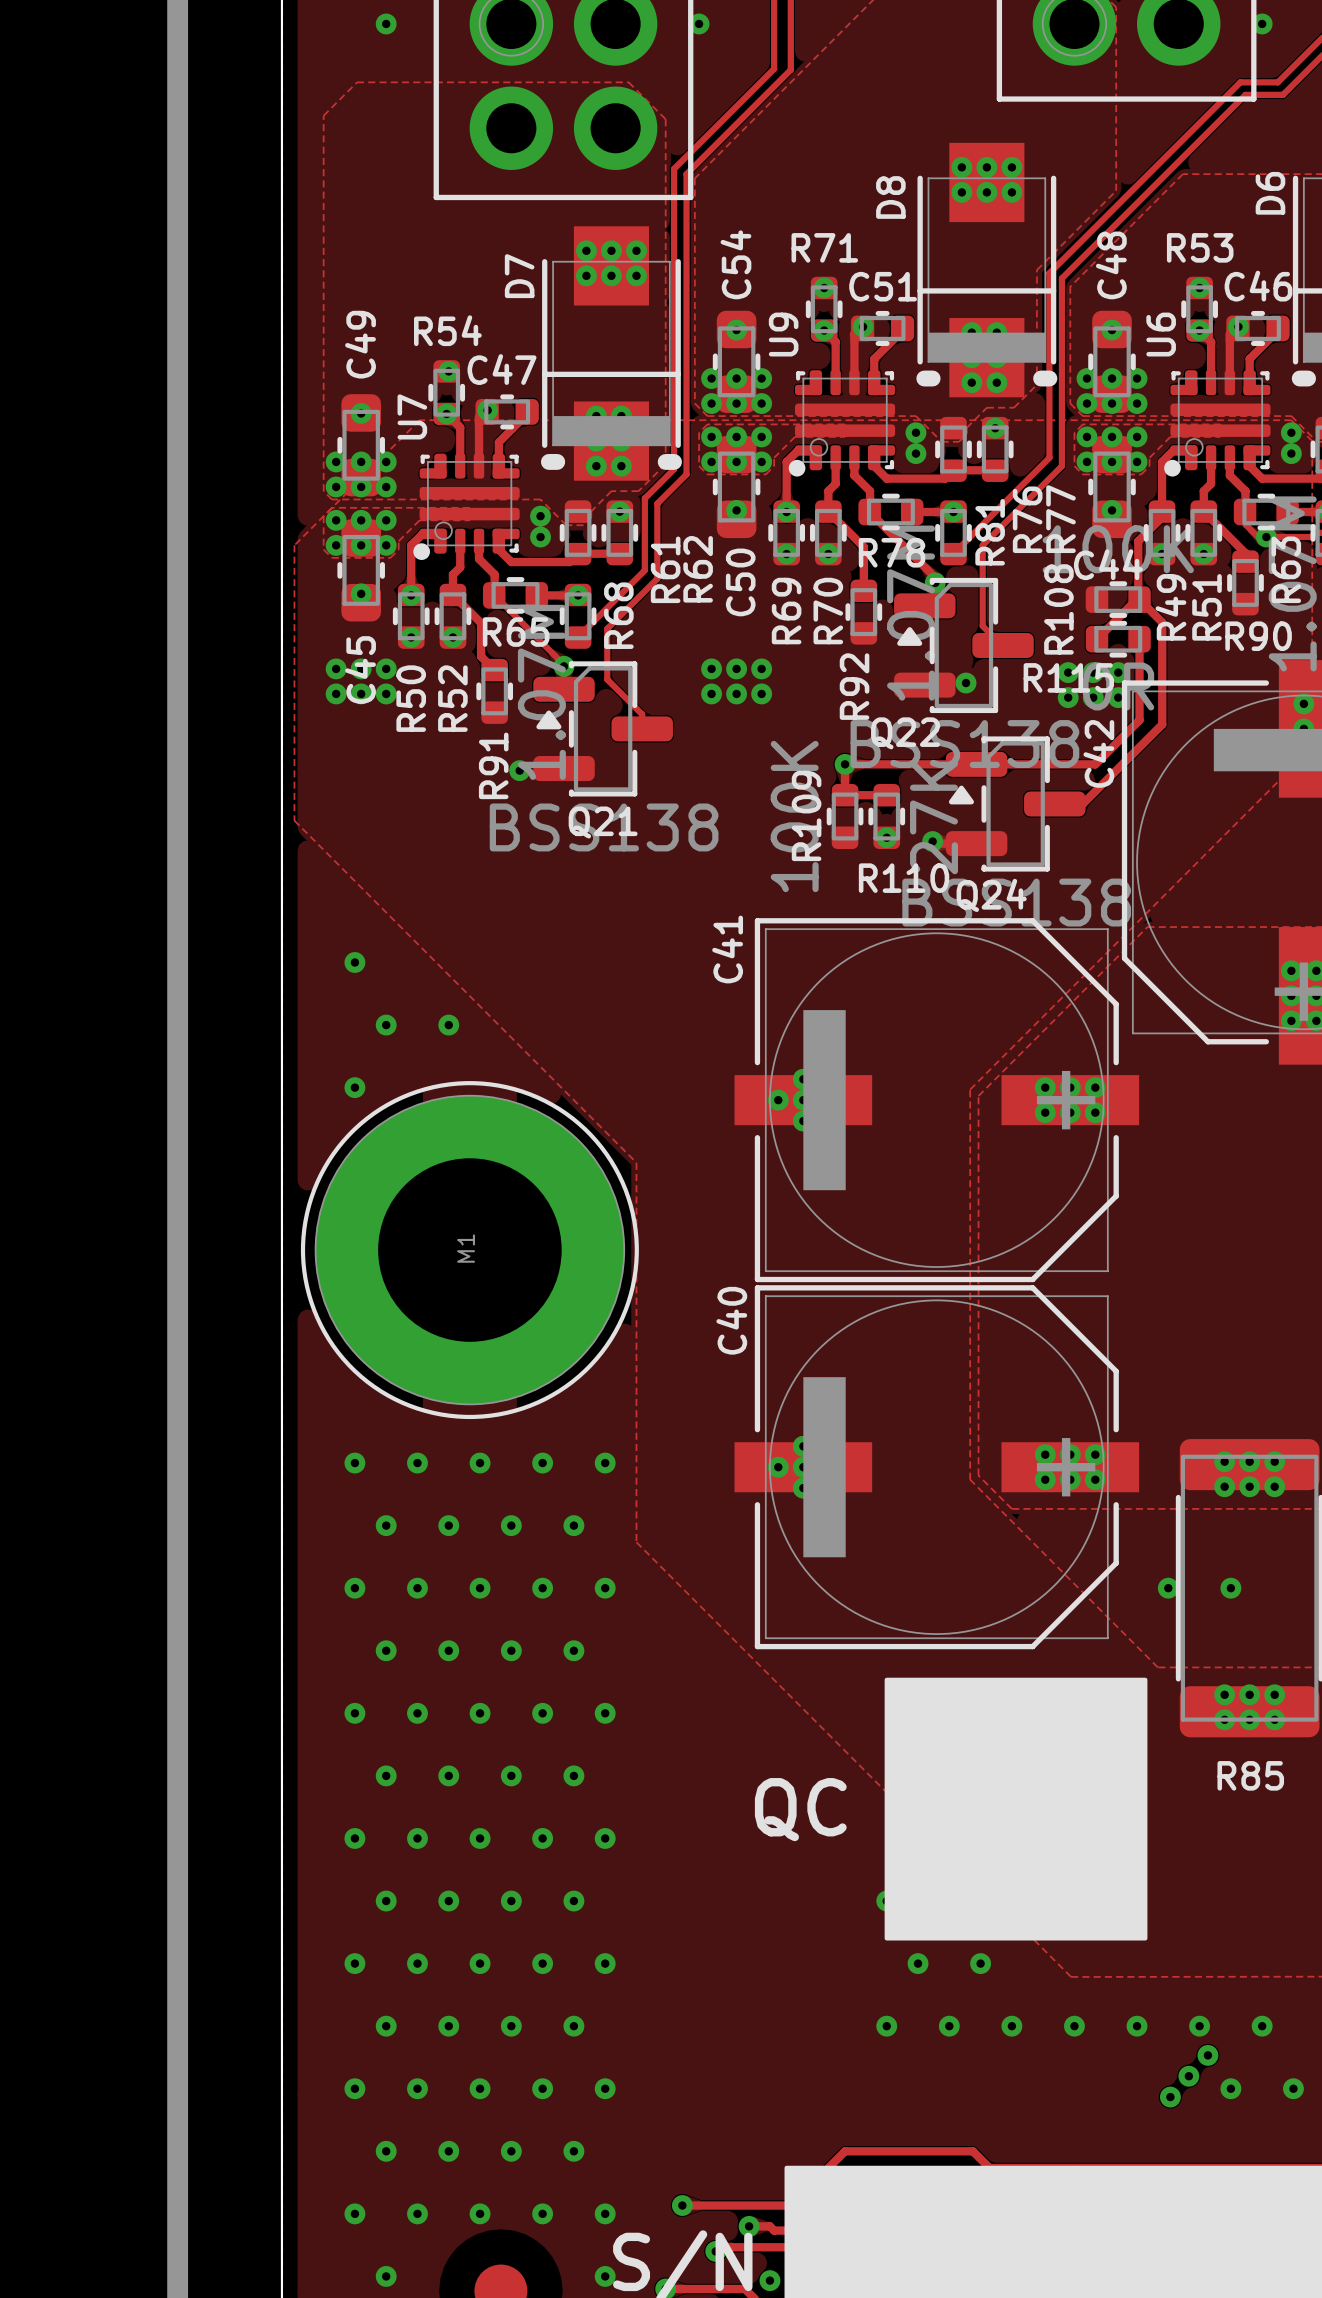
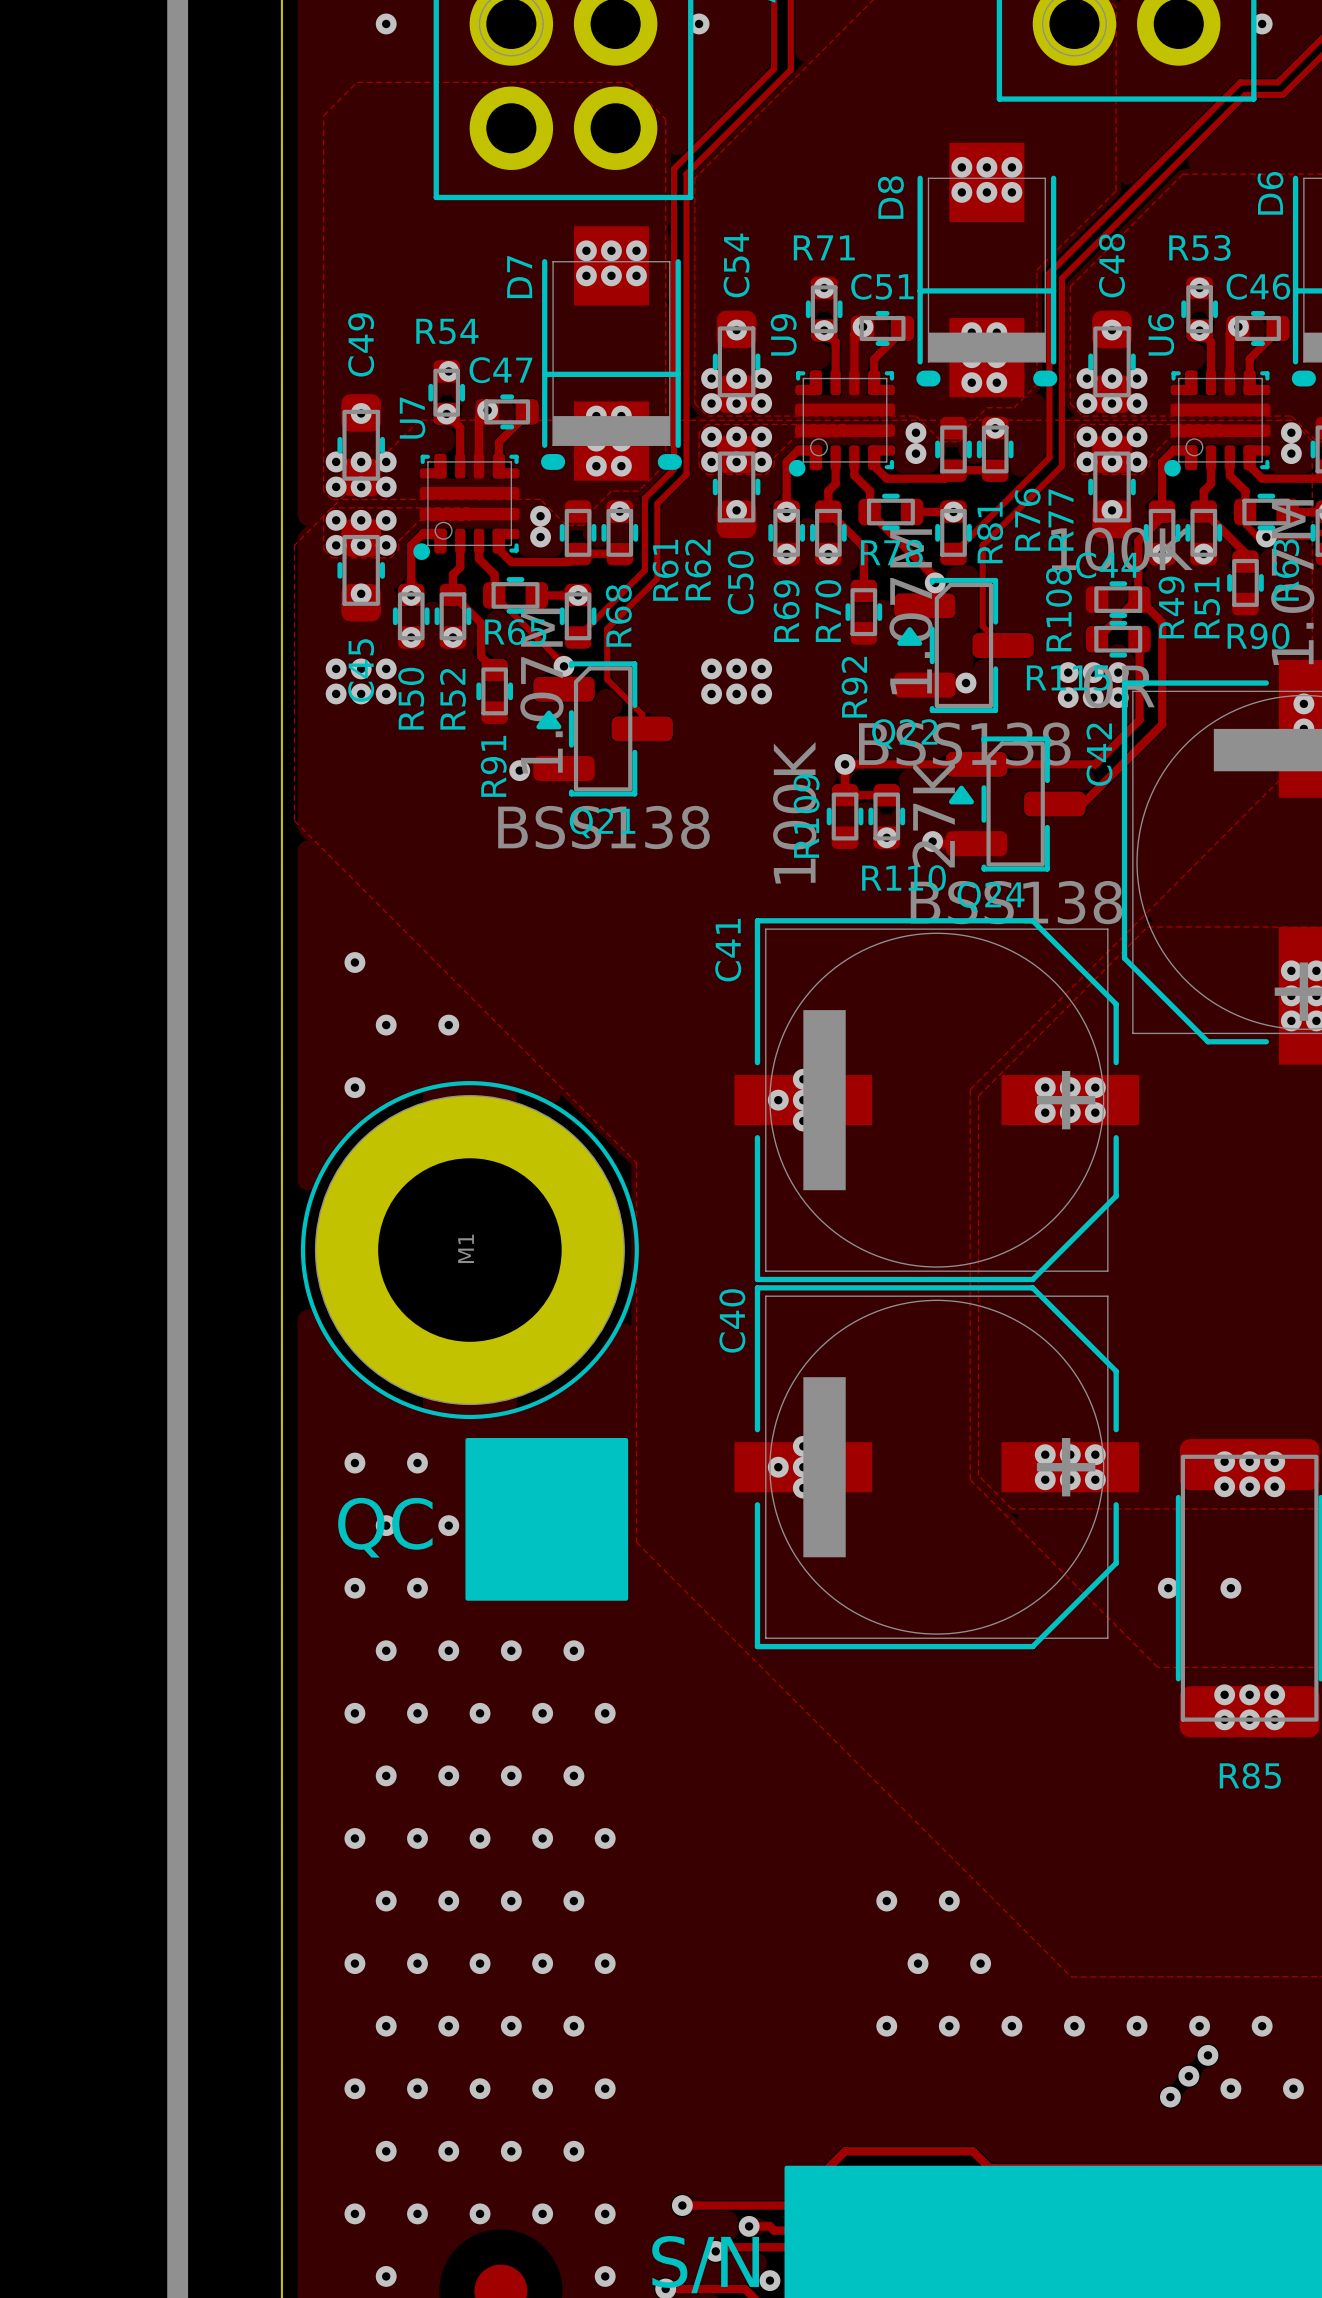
drawing: none -> [465, 1438, 629, 1601]
drawing: [884, 1677, 1148, 1941] -> none
text position: QC (800, 1809) -> QC (385, 1527)

